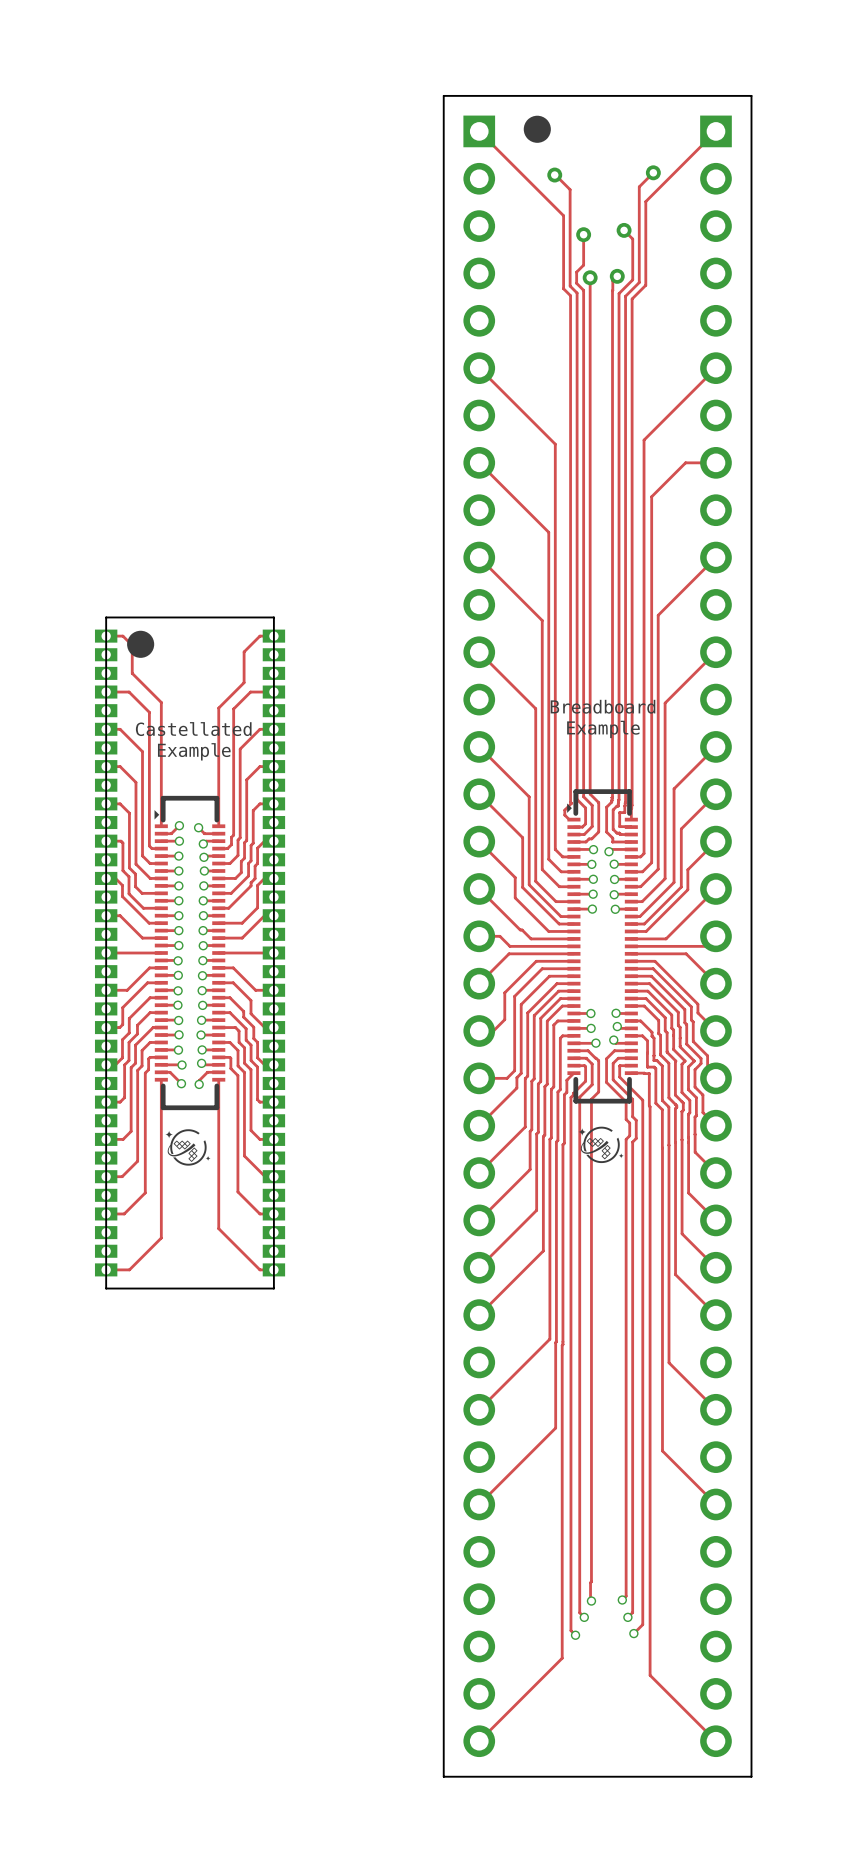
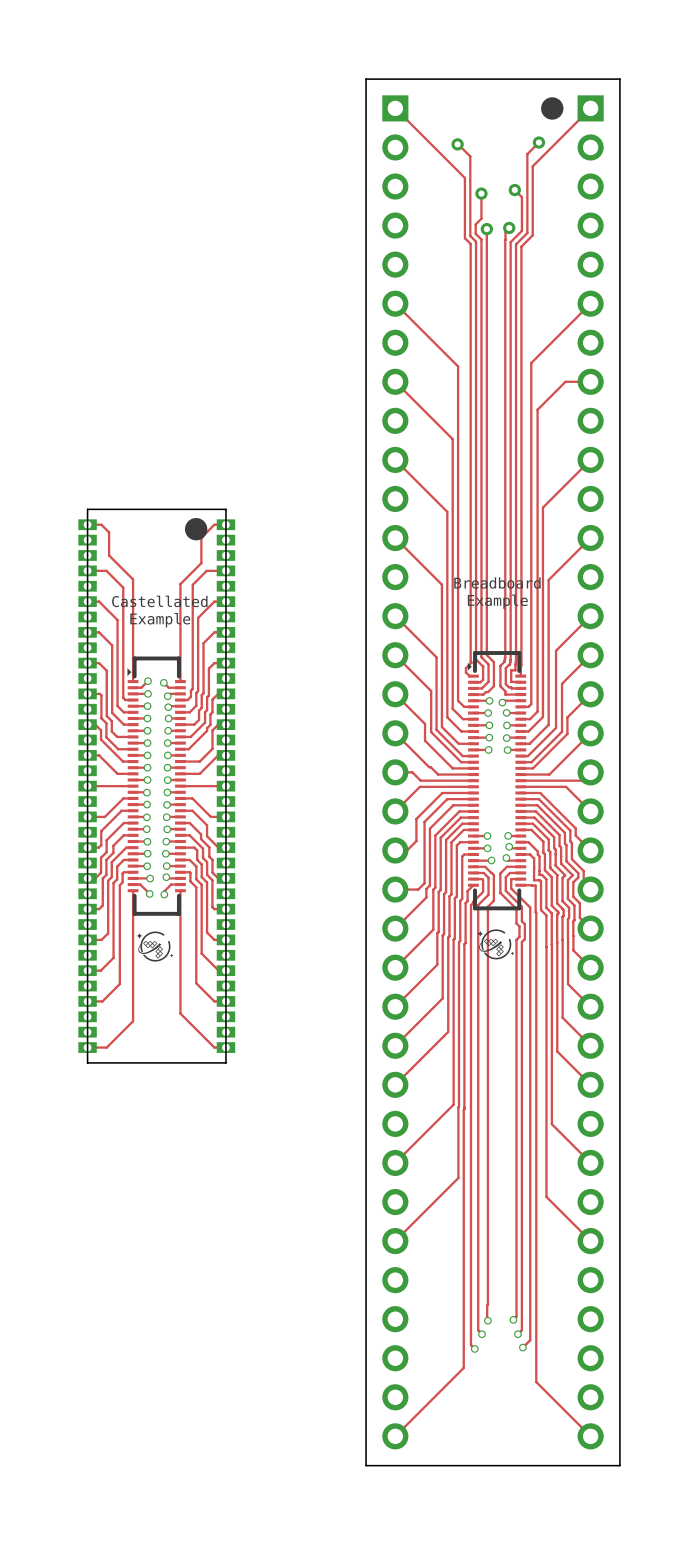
drawing position: (537, 129) -> (552, 108)
drawing position: (140, 644) -> (196, 529)

